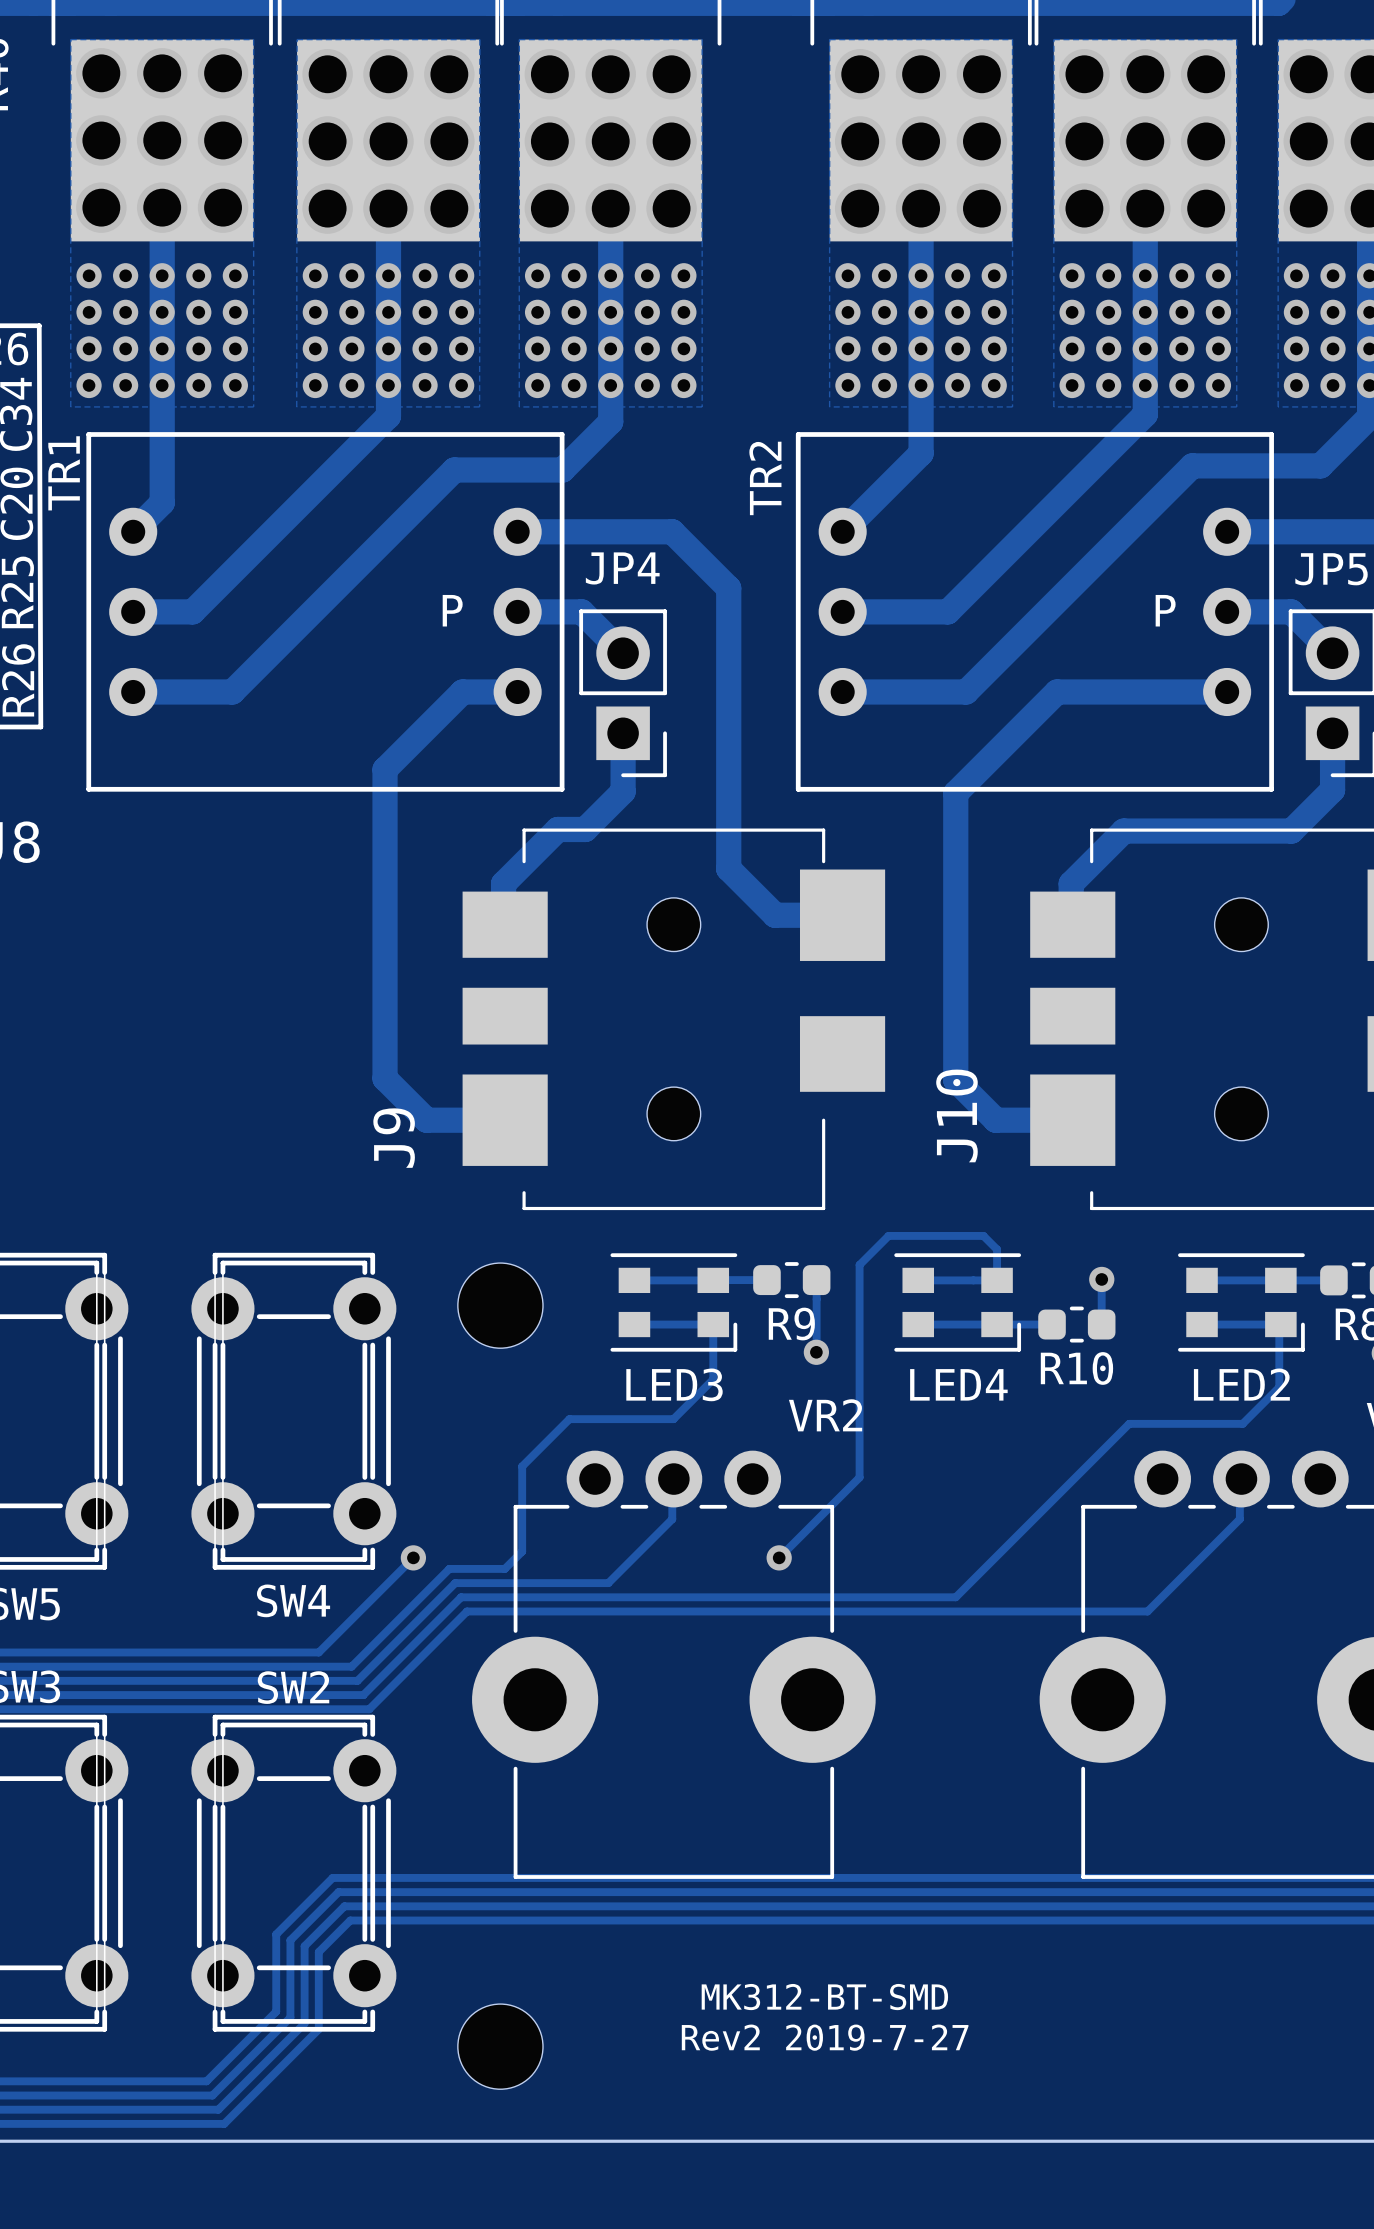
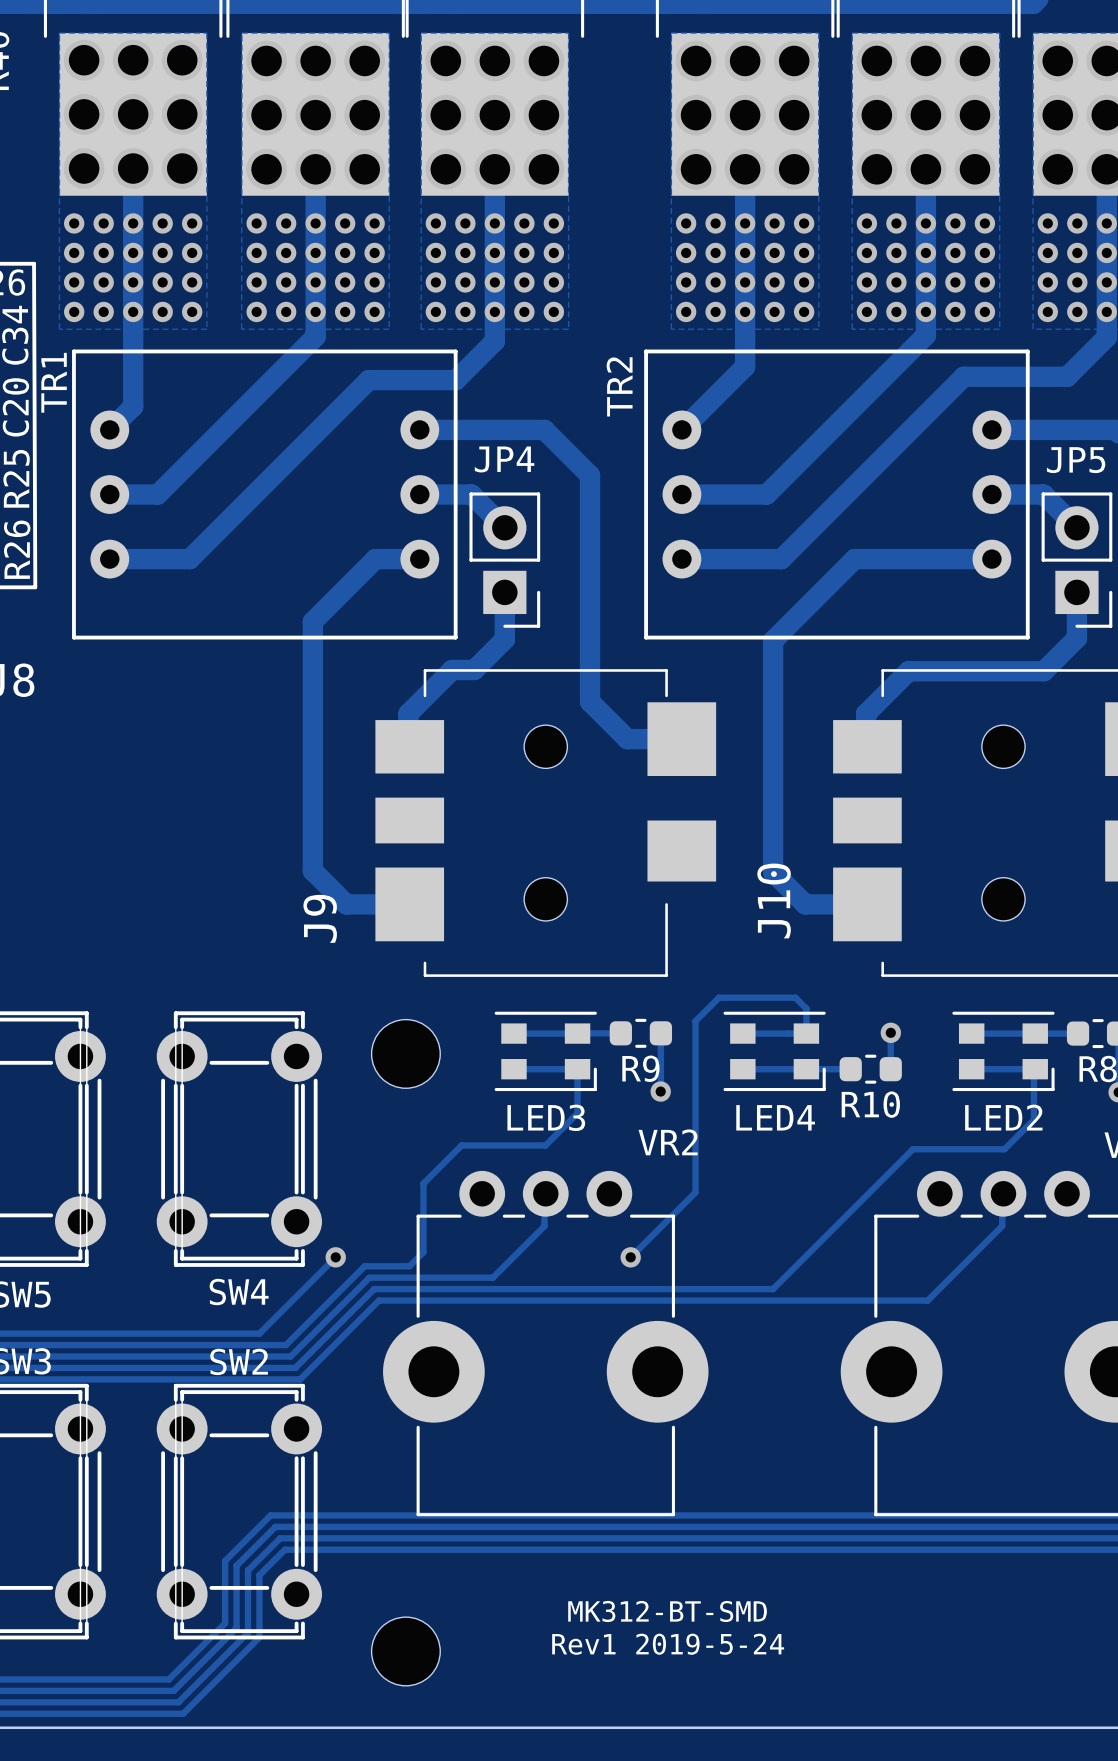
text: P (452, 610) -> none
text: P (1165, 610) -> none
text: Rev2 2019-7-27 (825, 2037) -> Rev1 2019-5-24 (668, 1644)

